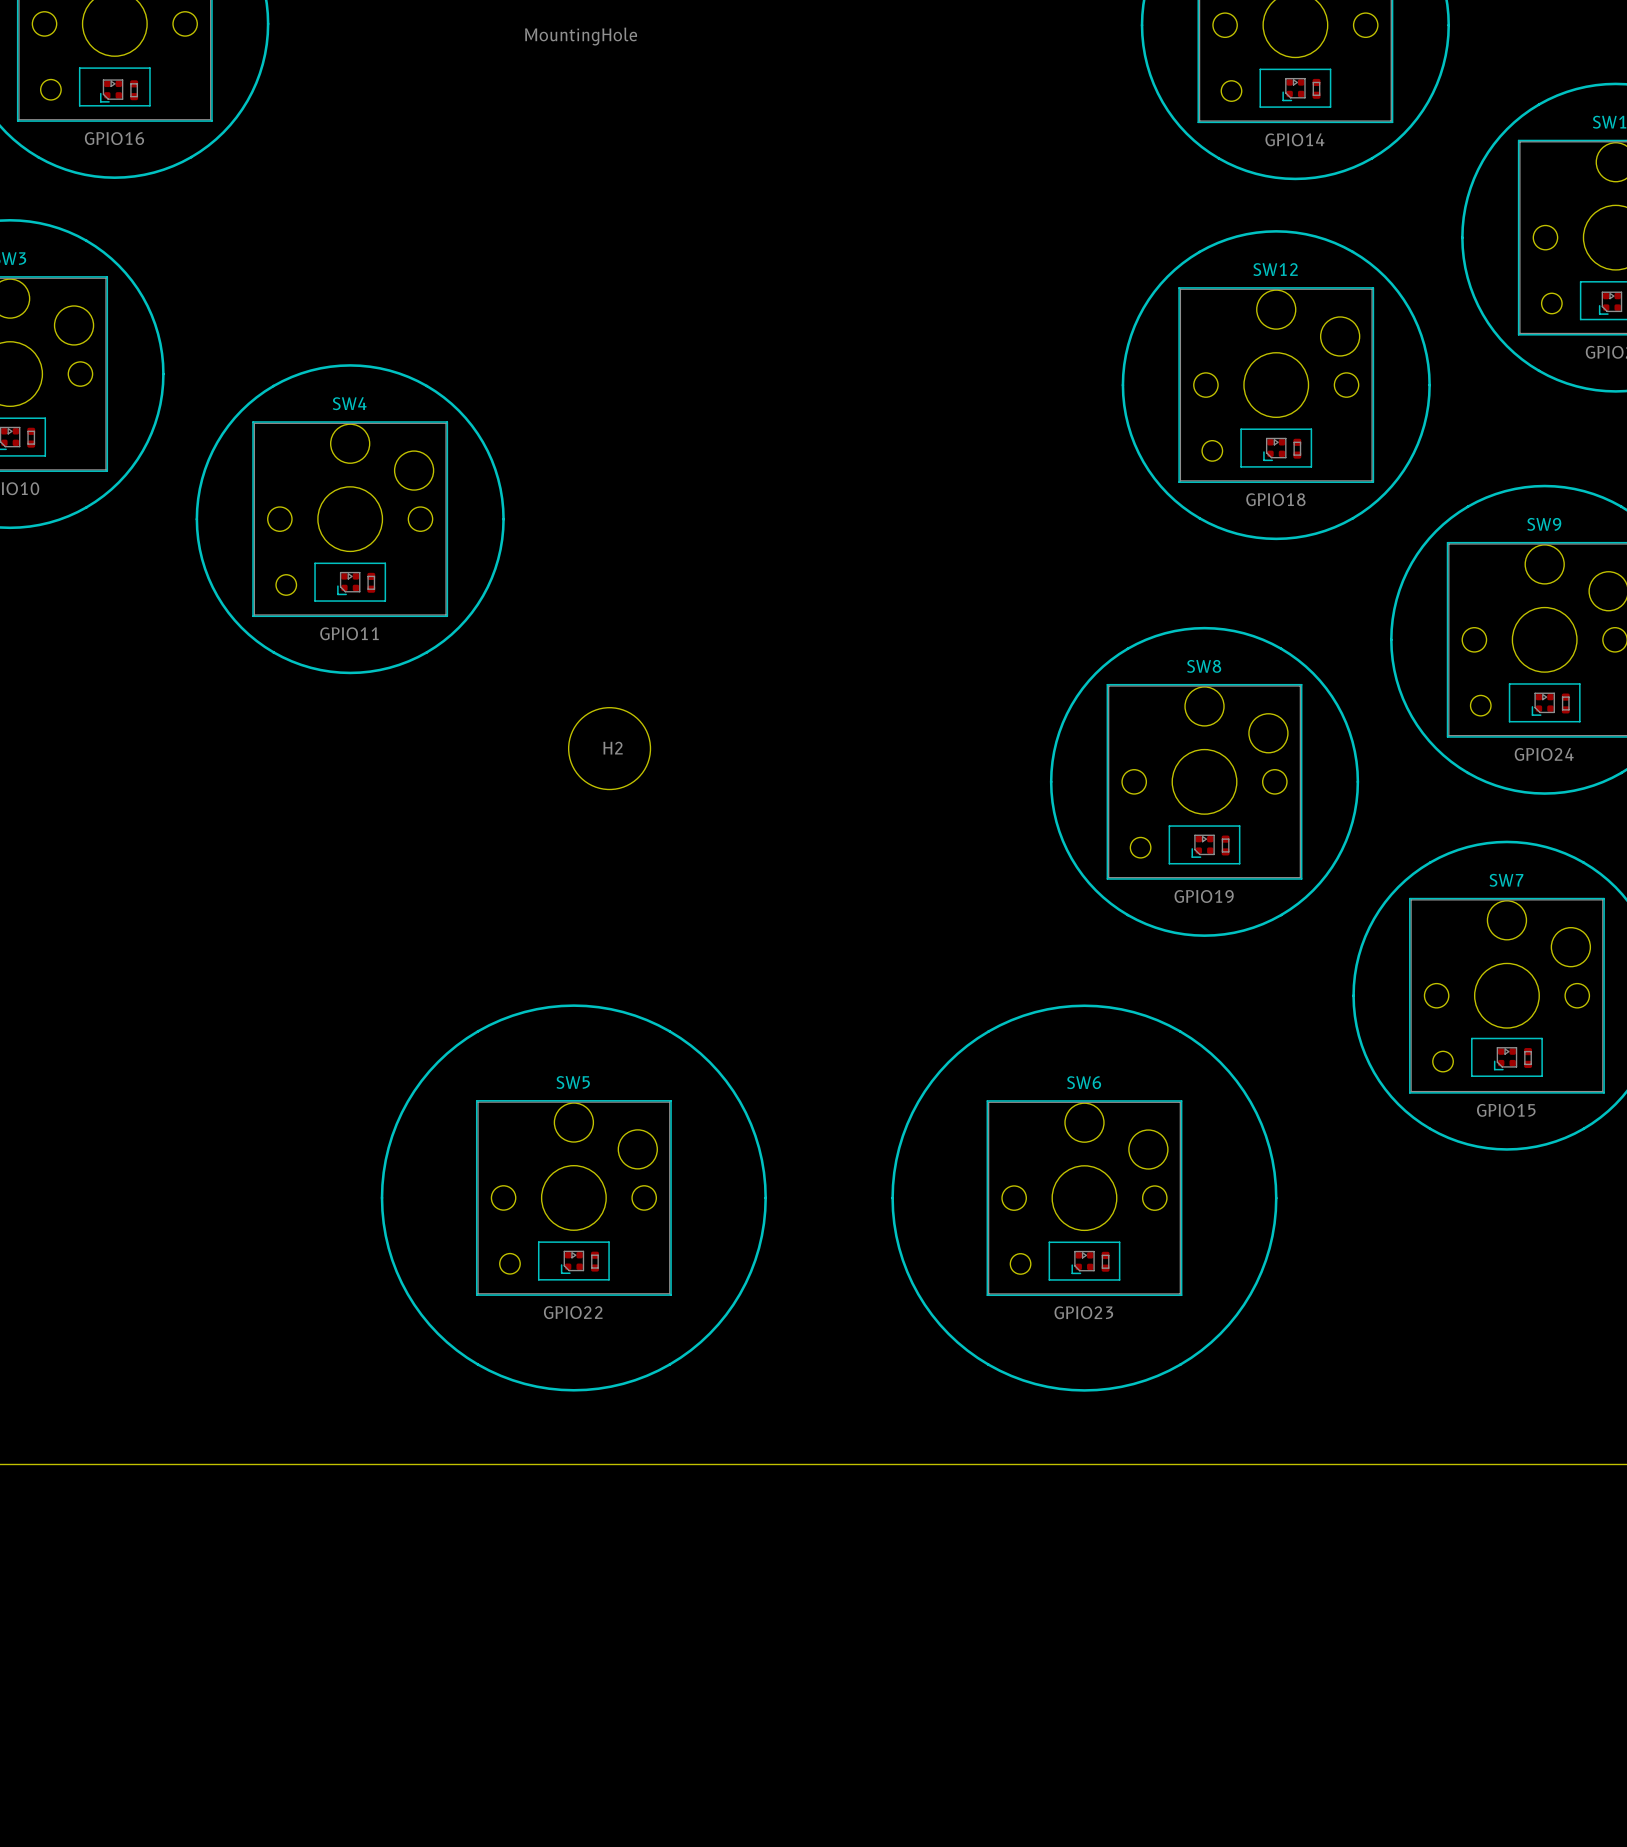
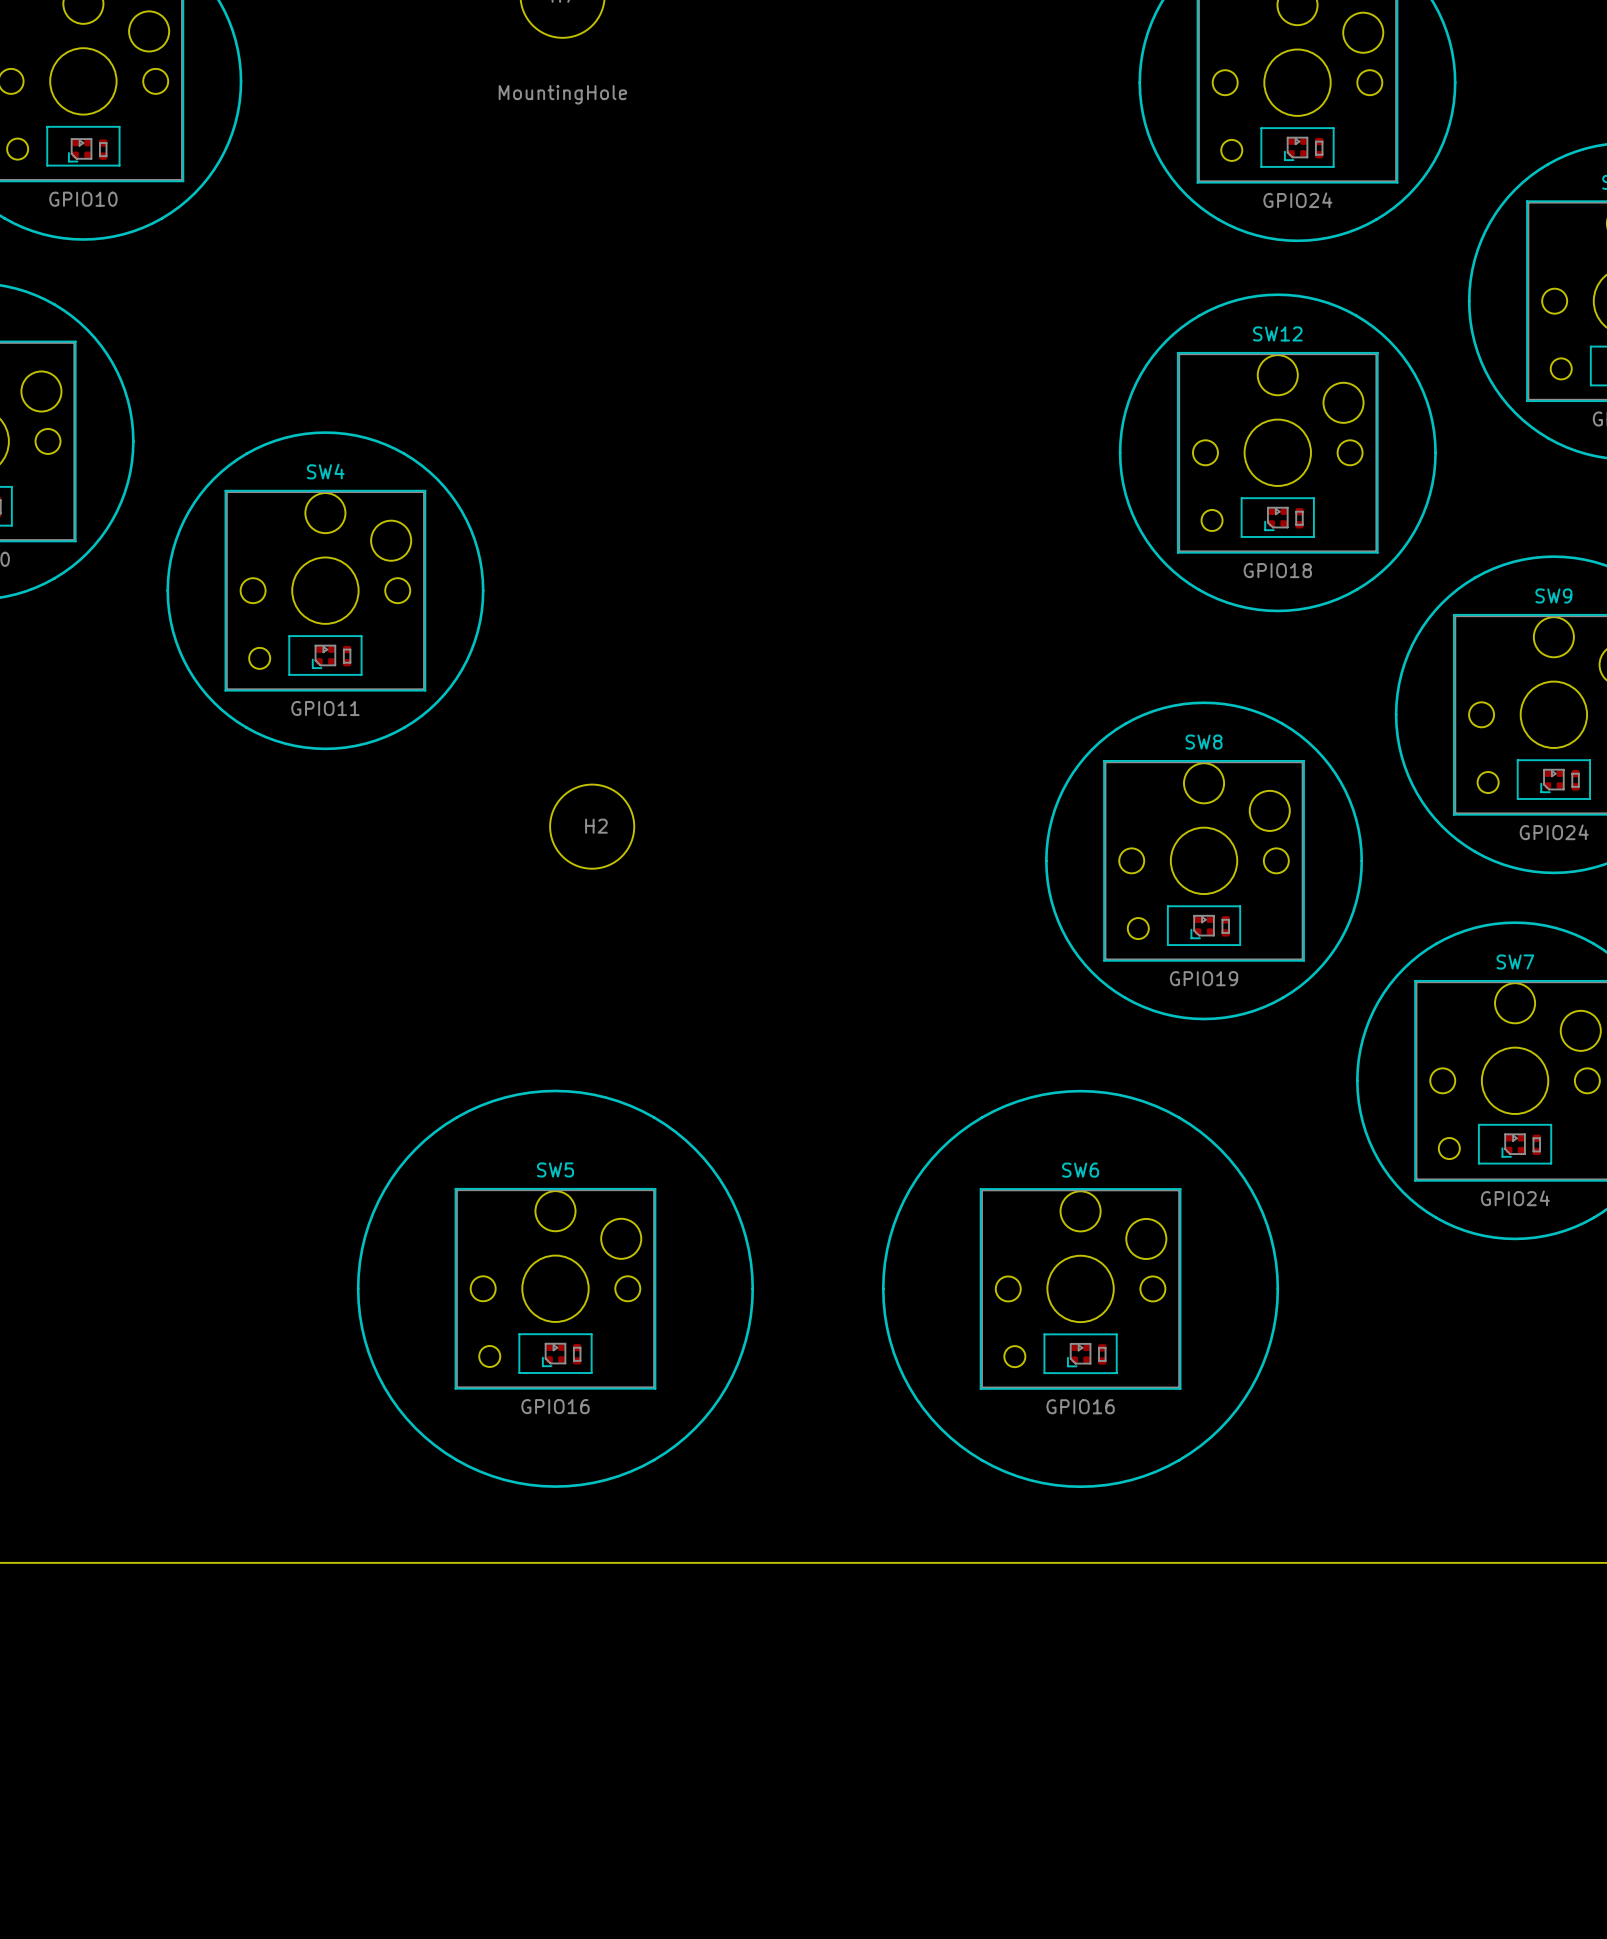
part value: GPIO16 (114, 138) -> GPIO10 (83, 199)
part value: GPIO14 (1294, 139) -> GPIO24 (1297, 200)
SW7 value: GPIO15 (1506, 1110) -> GPIO24 (1515, 1198)
SW5 value: GPIO22 (573, 1312) -> GPIO16 (555, 1406)
SW6 value: GPIO23 (1083, 1312) -> GPIO16 (1080, 1406)

